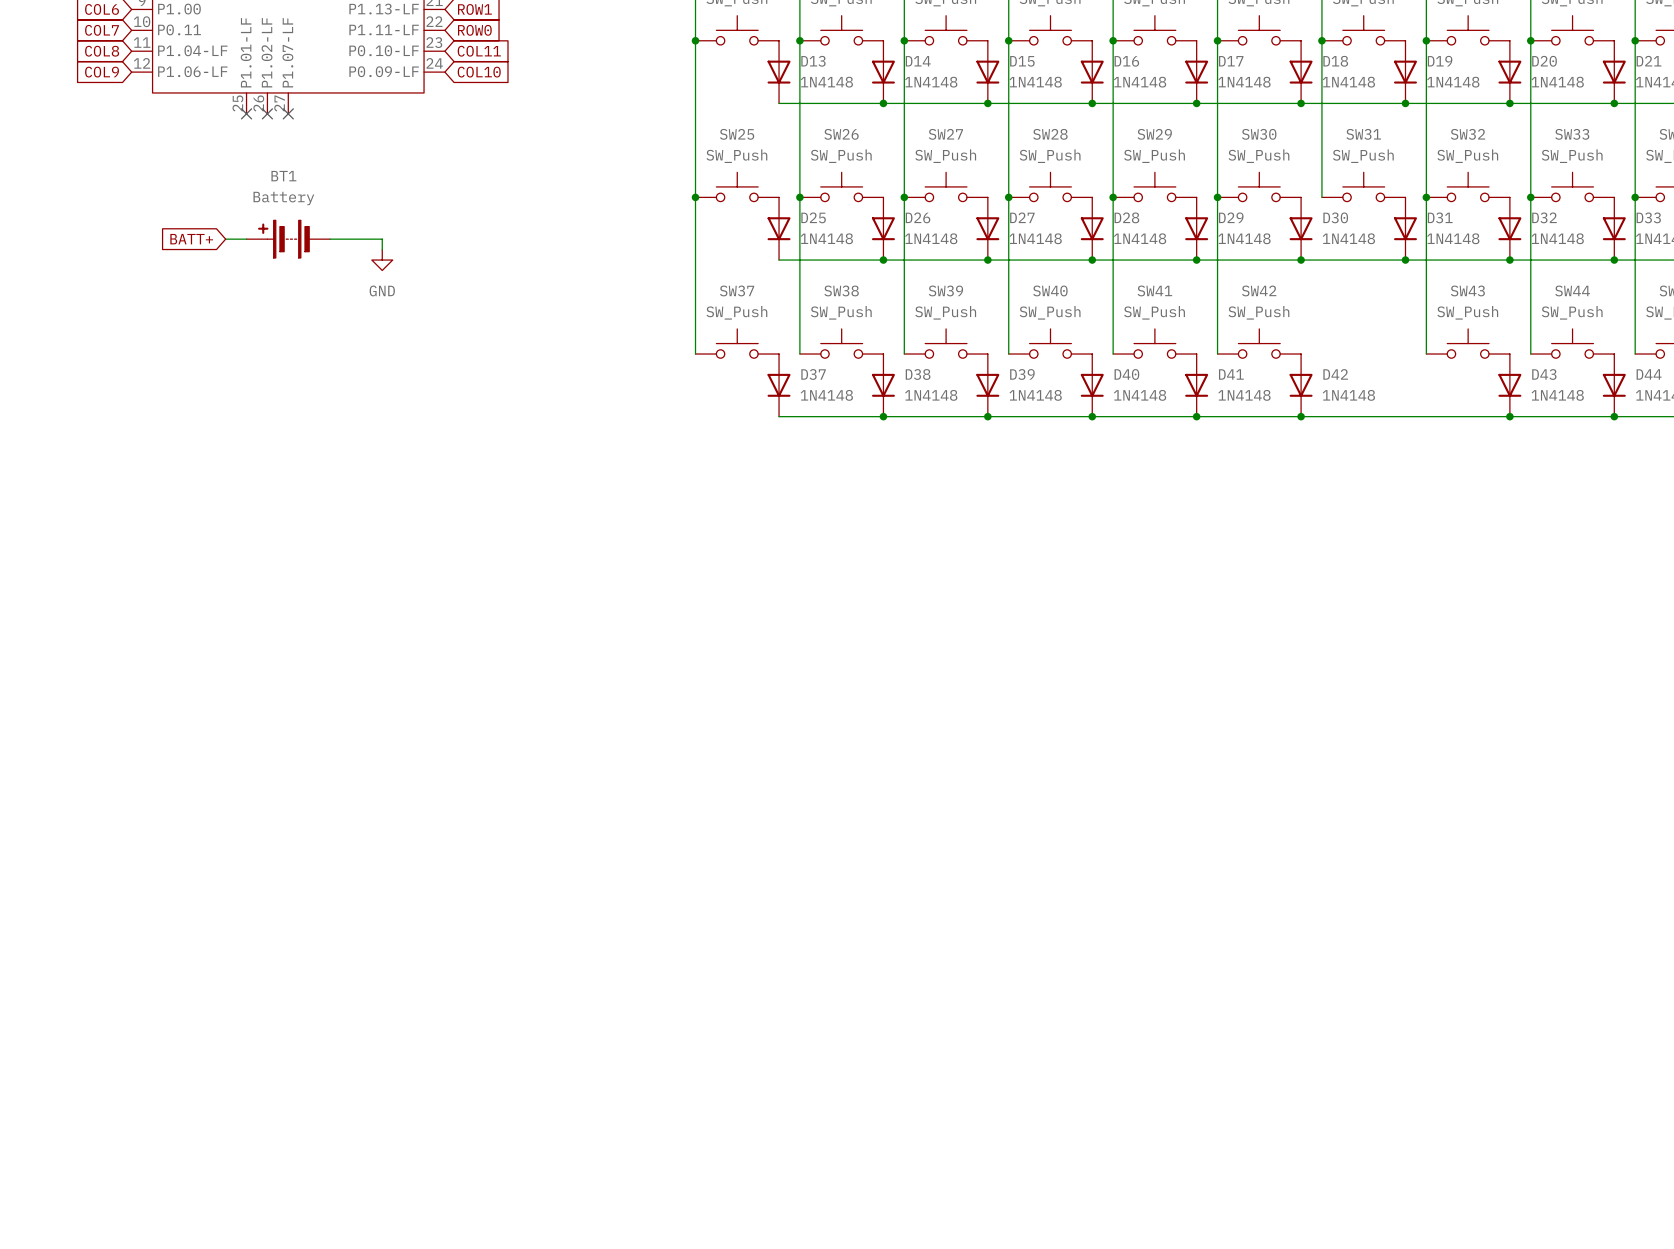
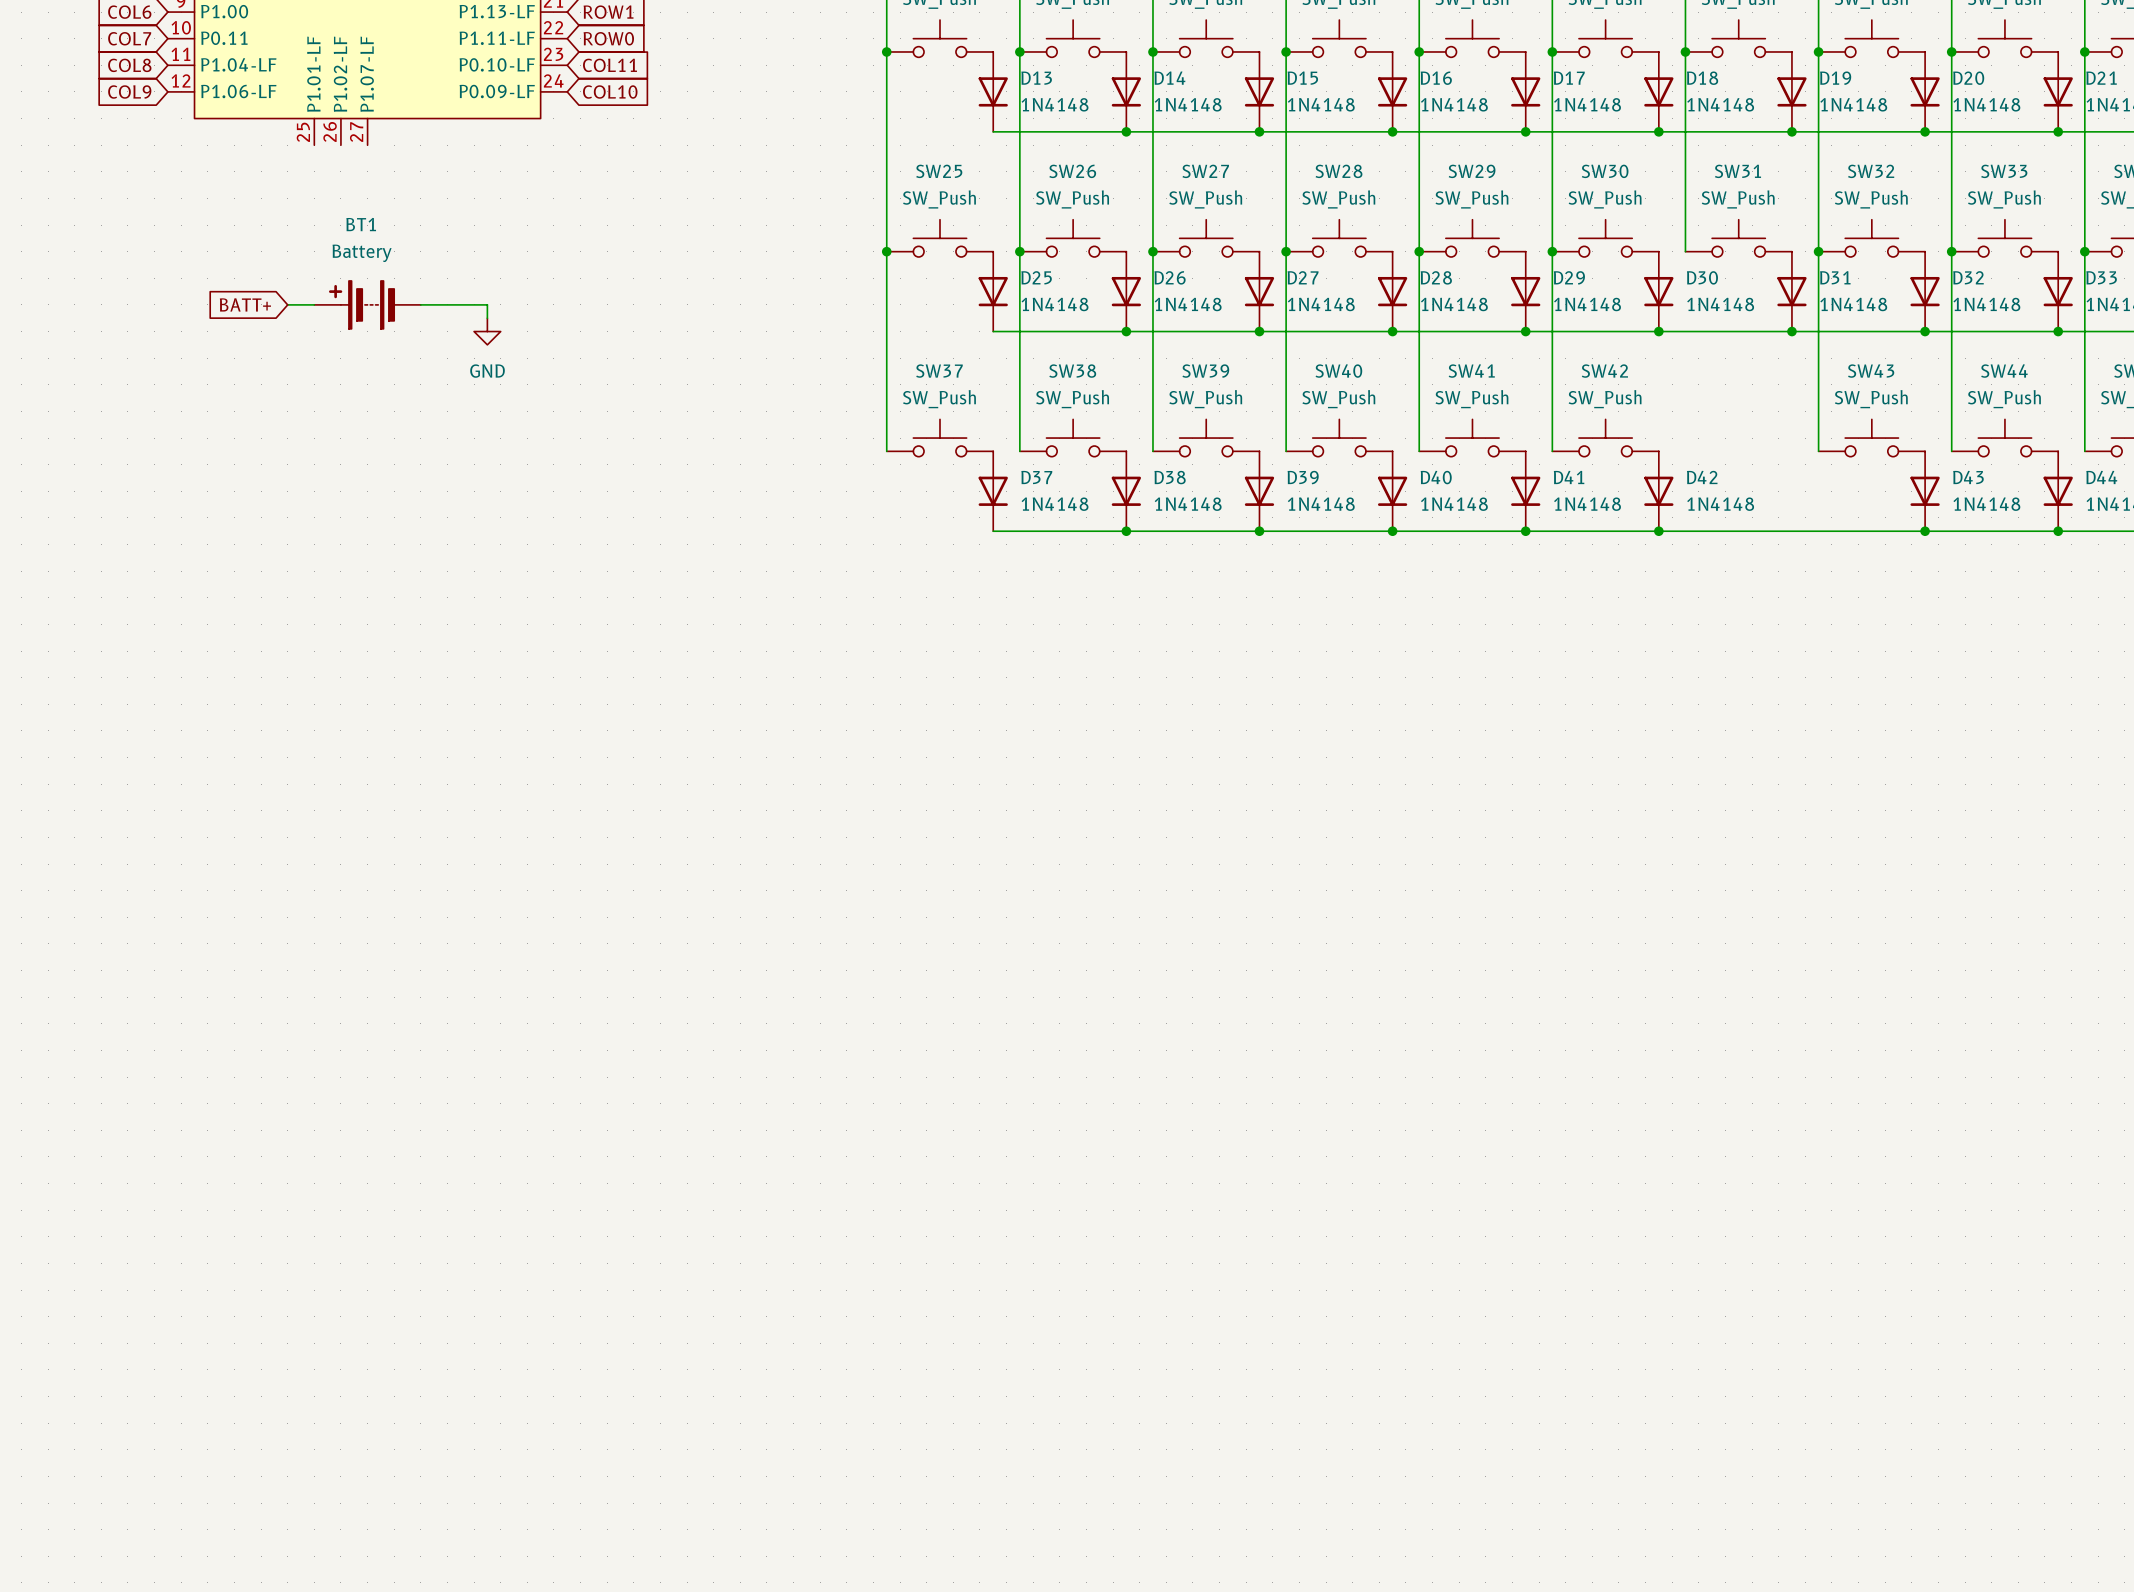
no-connect mark: (246, 113) -> none
no-connect mark: (267, 113) -> none
no-connect mark: (288, 113) -> none

